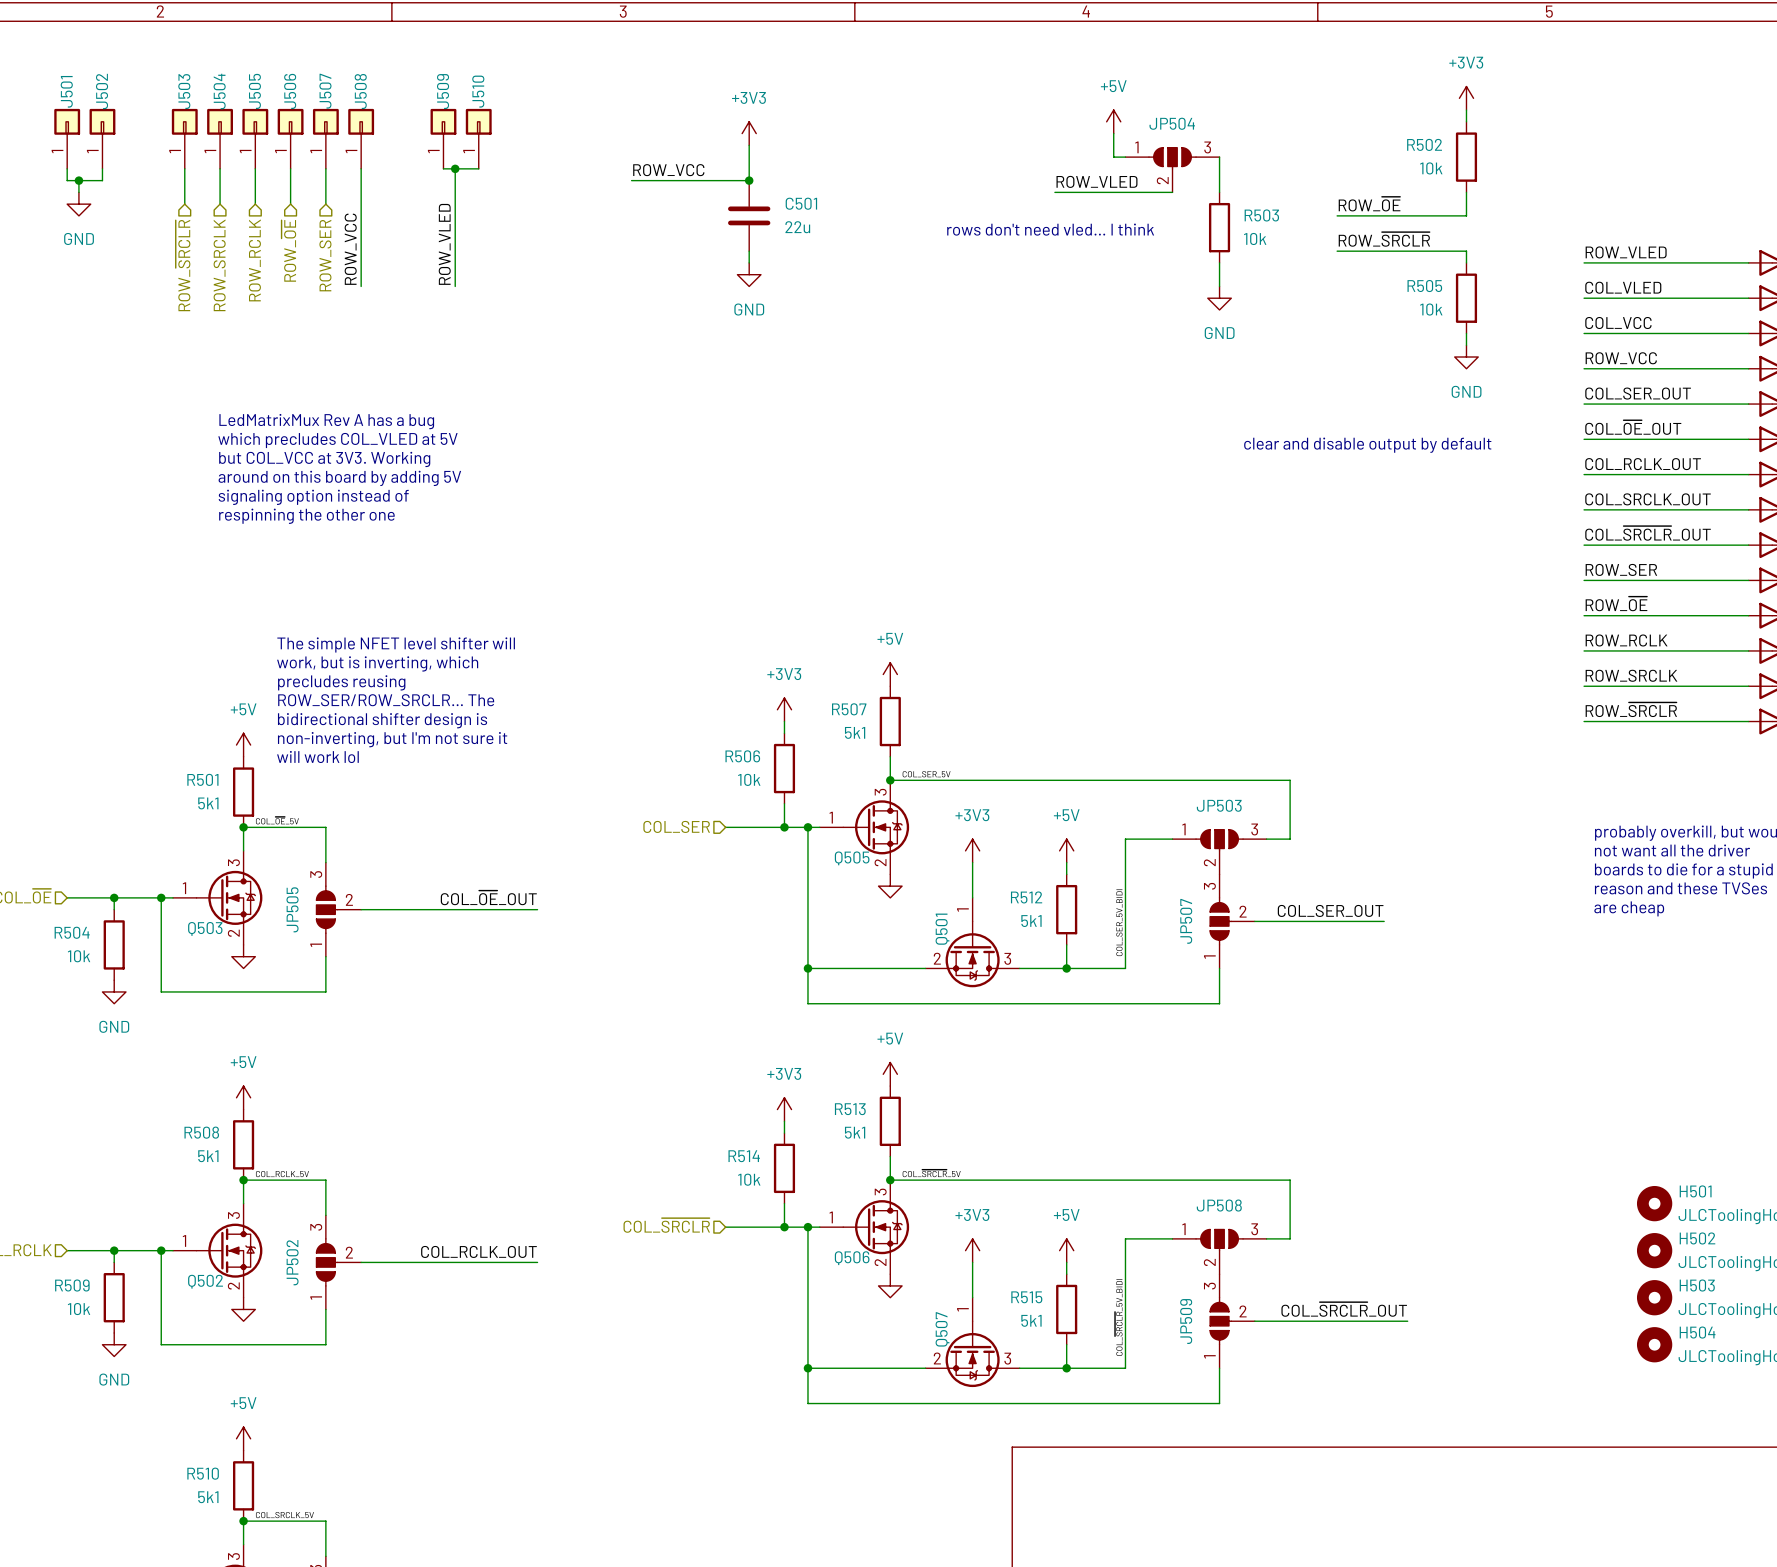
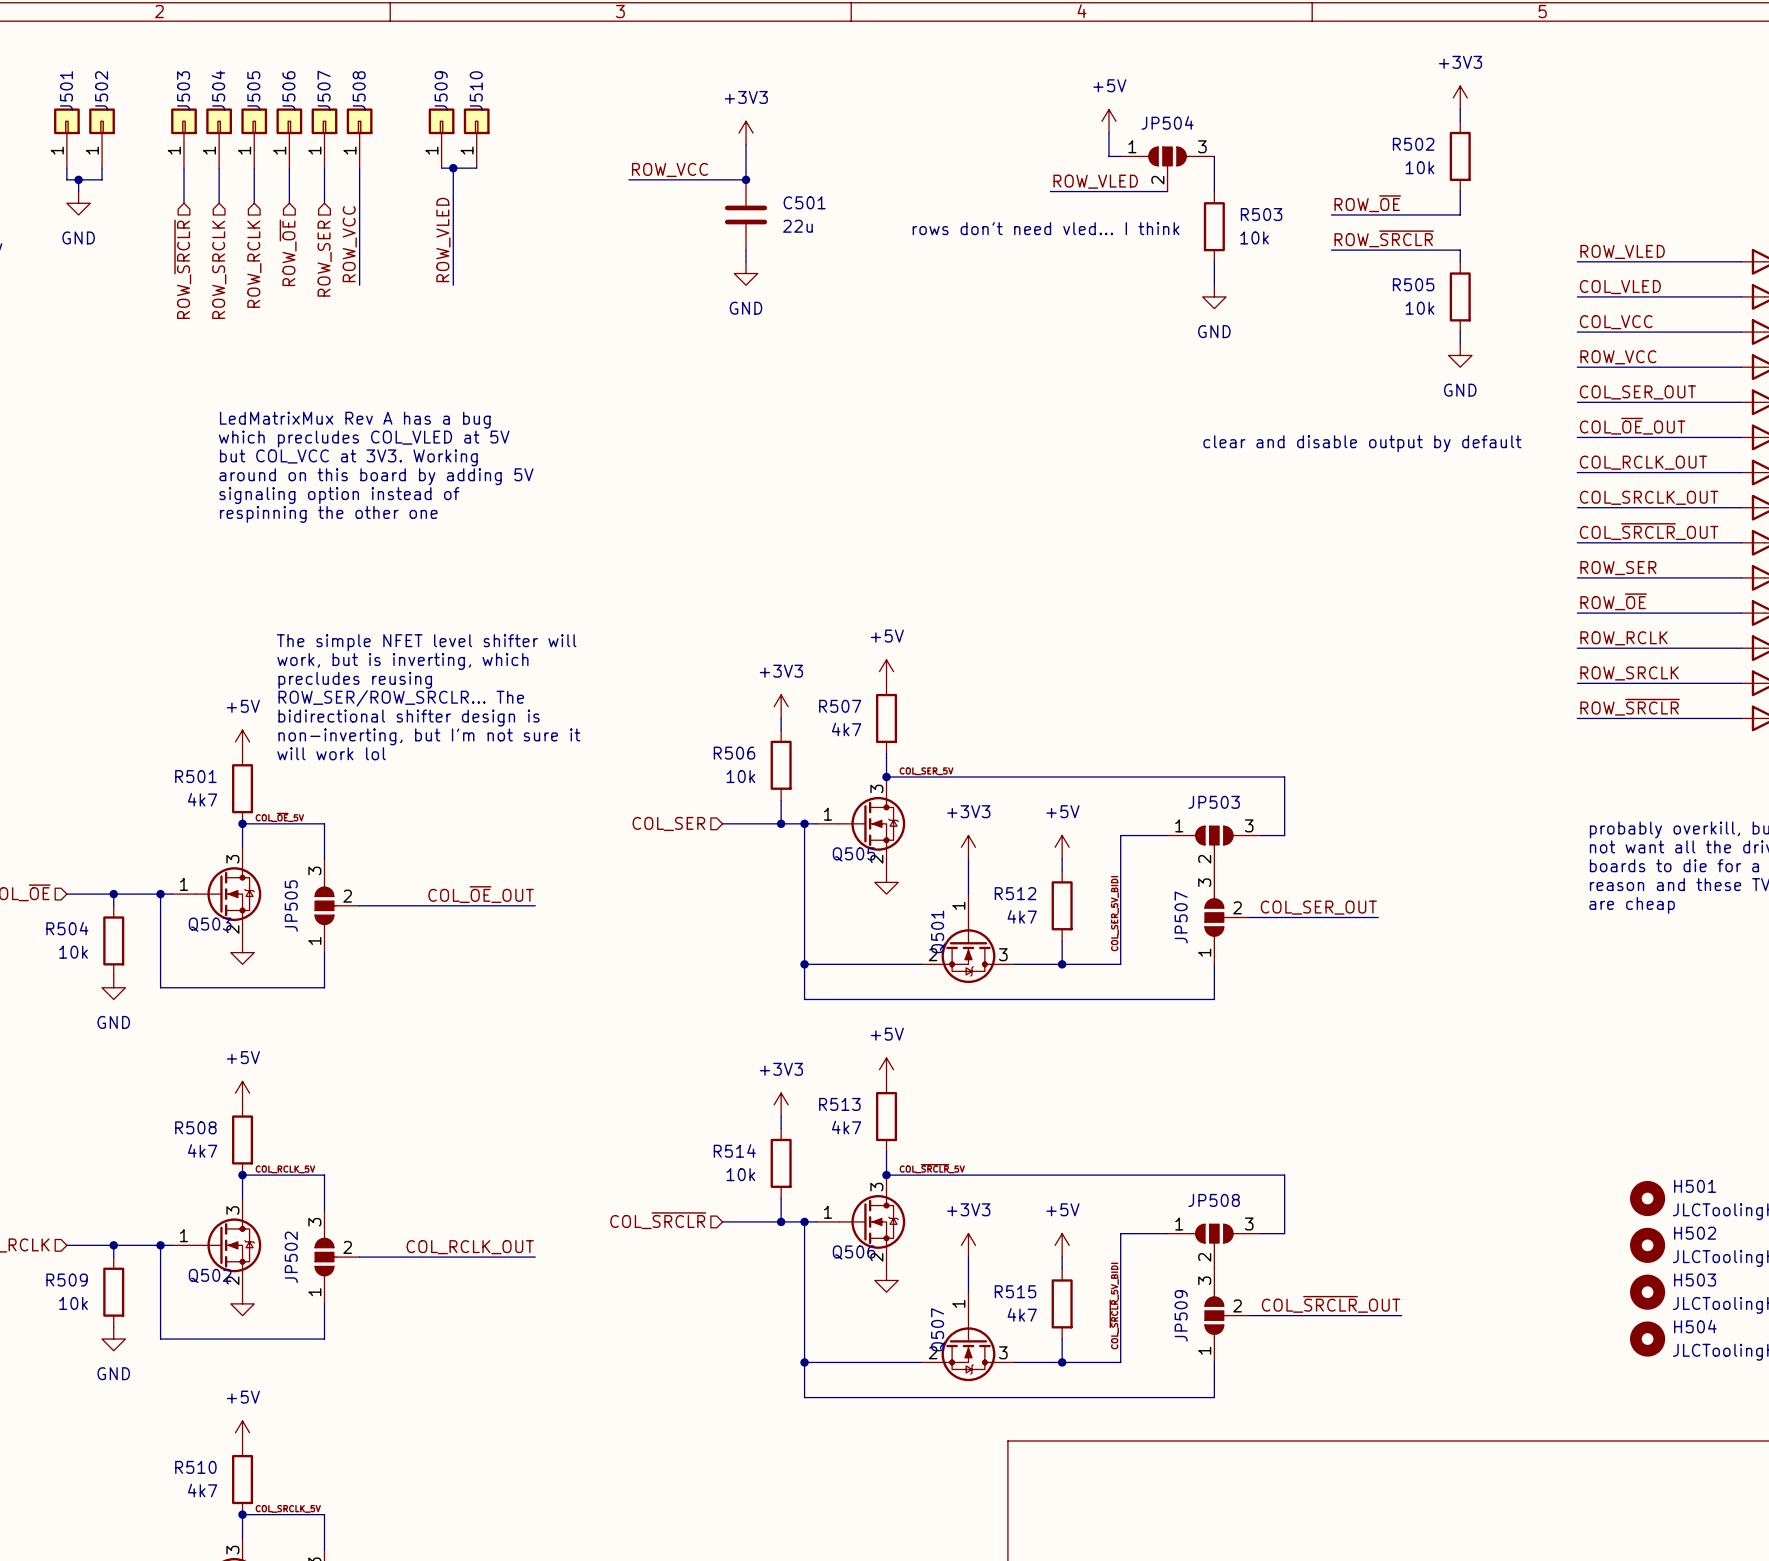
R507 value: 5k1 (855, 732) -> 4k7 (846, 729)
R501 value: 5k1 (208, 803) -> 4k7 (202, 799)
R512 value: 5k1 (1031, 921) -> 4k7 (1022, 916)
R513 value: 5k1 (855, 1132) -> 4k7 (846, 1127)
R508 value: 5k1 (208, 1156) -> 4k7 (202, 1150)
R515 value: 5k1 (1031, 1320) -> 4k7 (1022, 1314)
R510 value: 5k1 (208, 1497) -> 4k7 (202, 1490)

